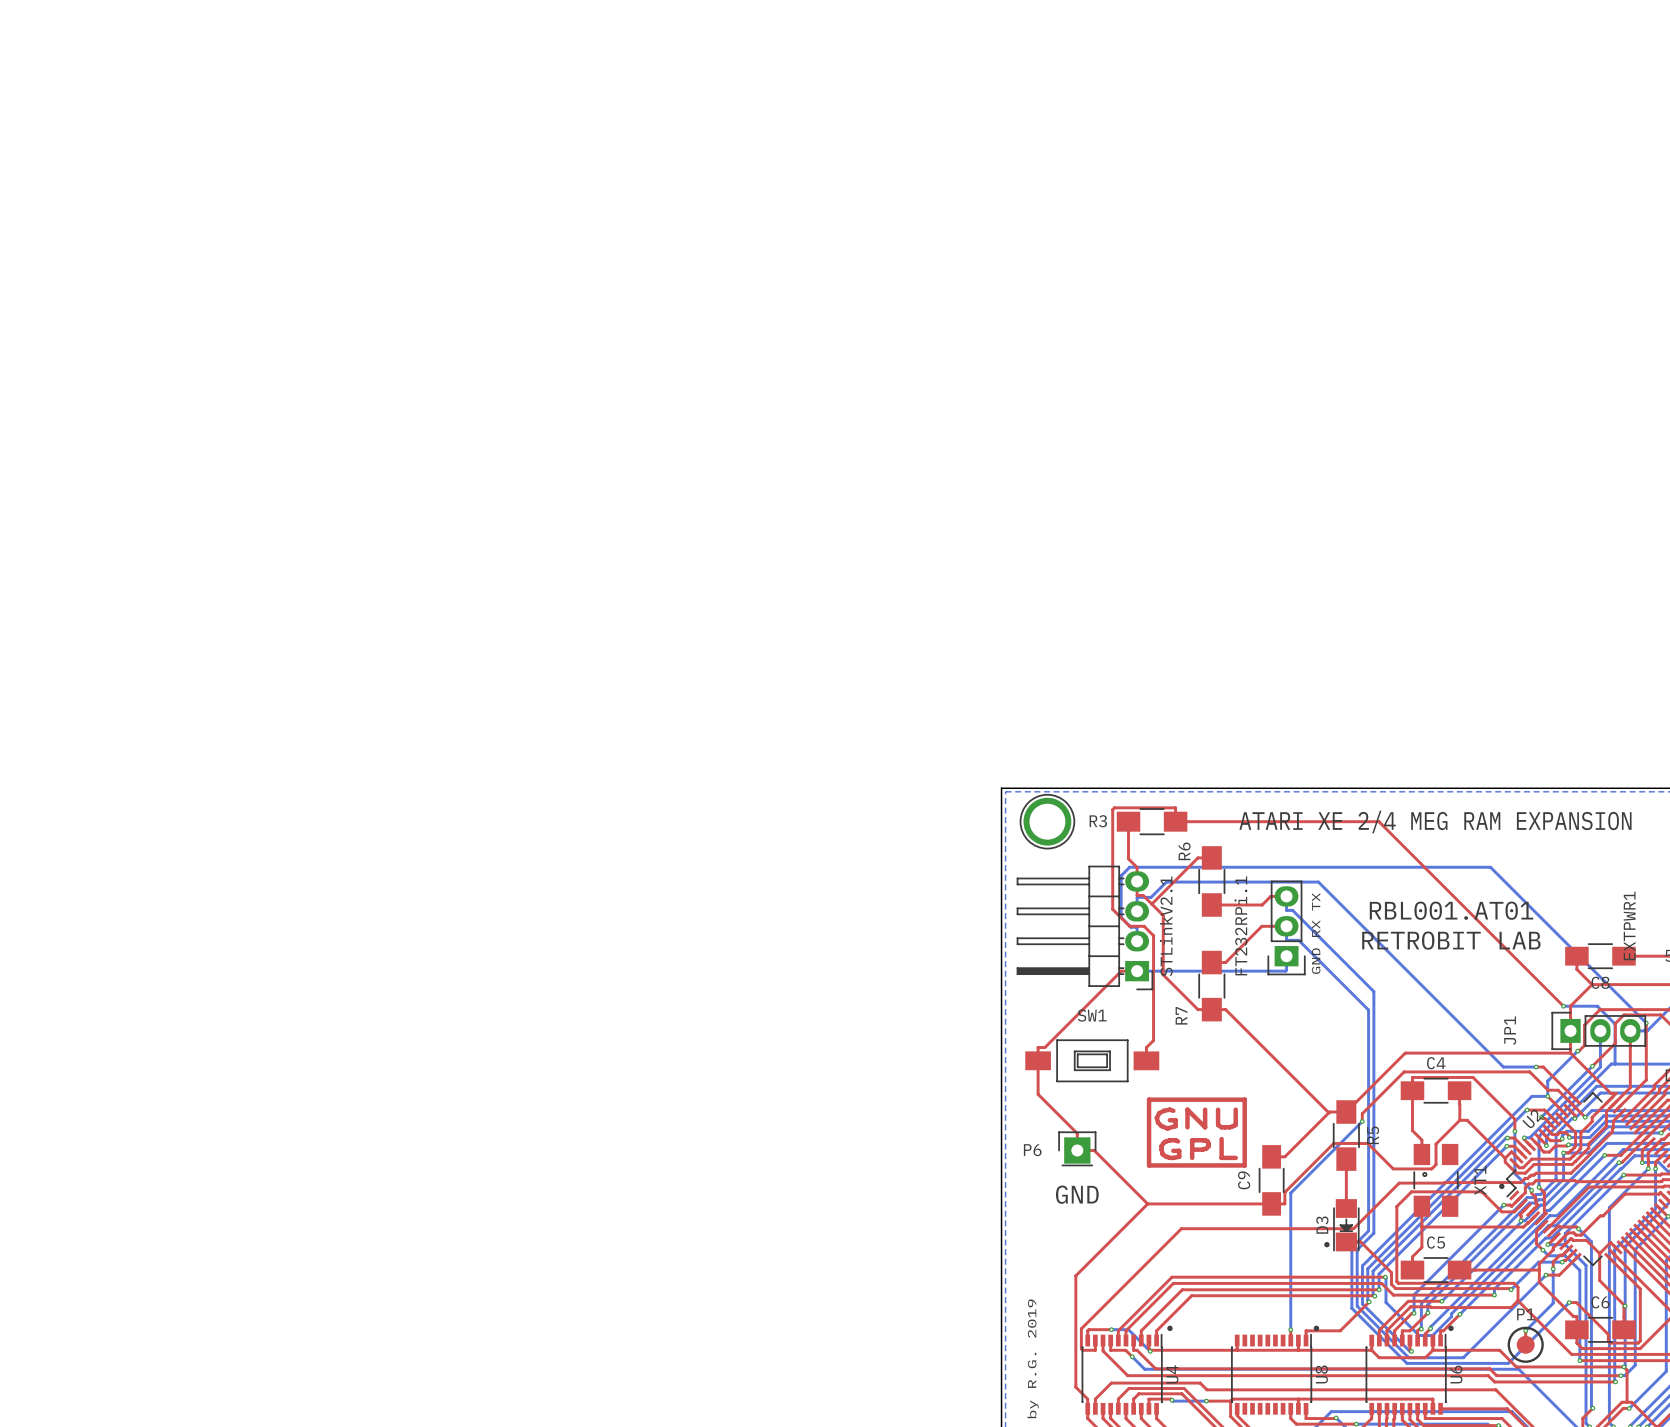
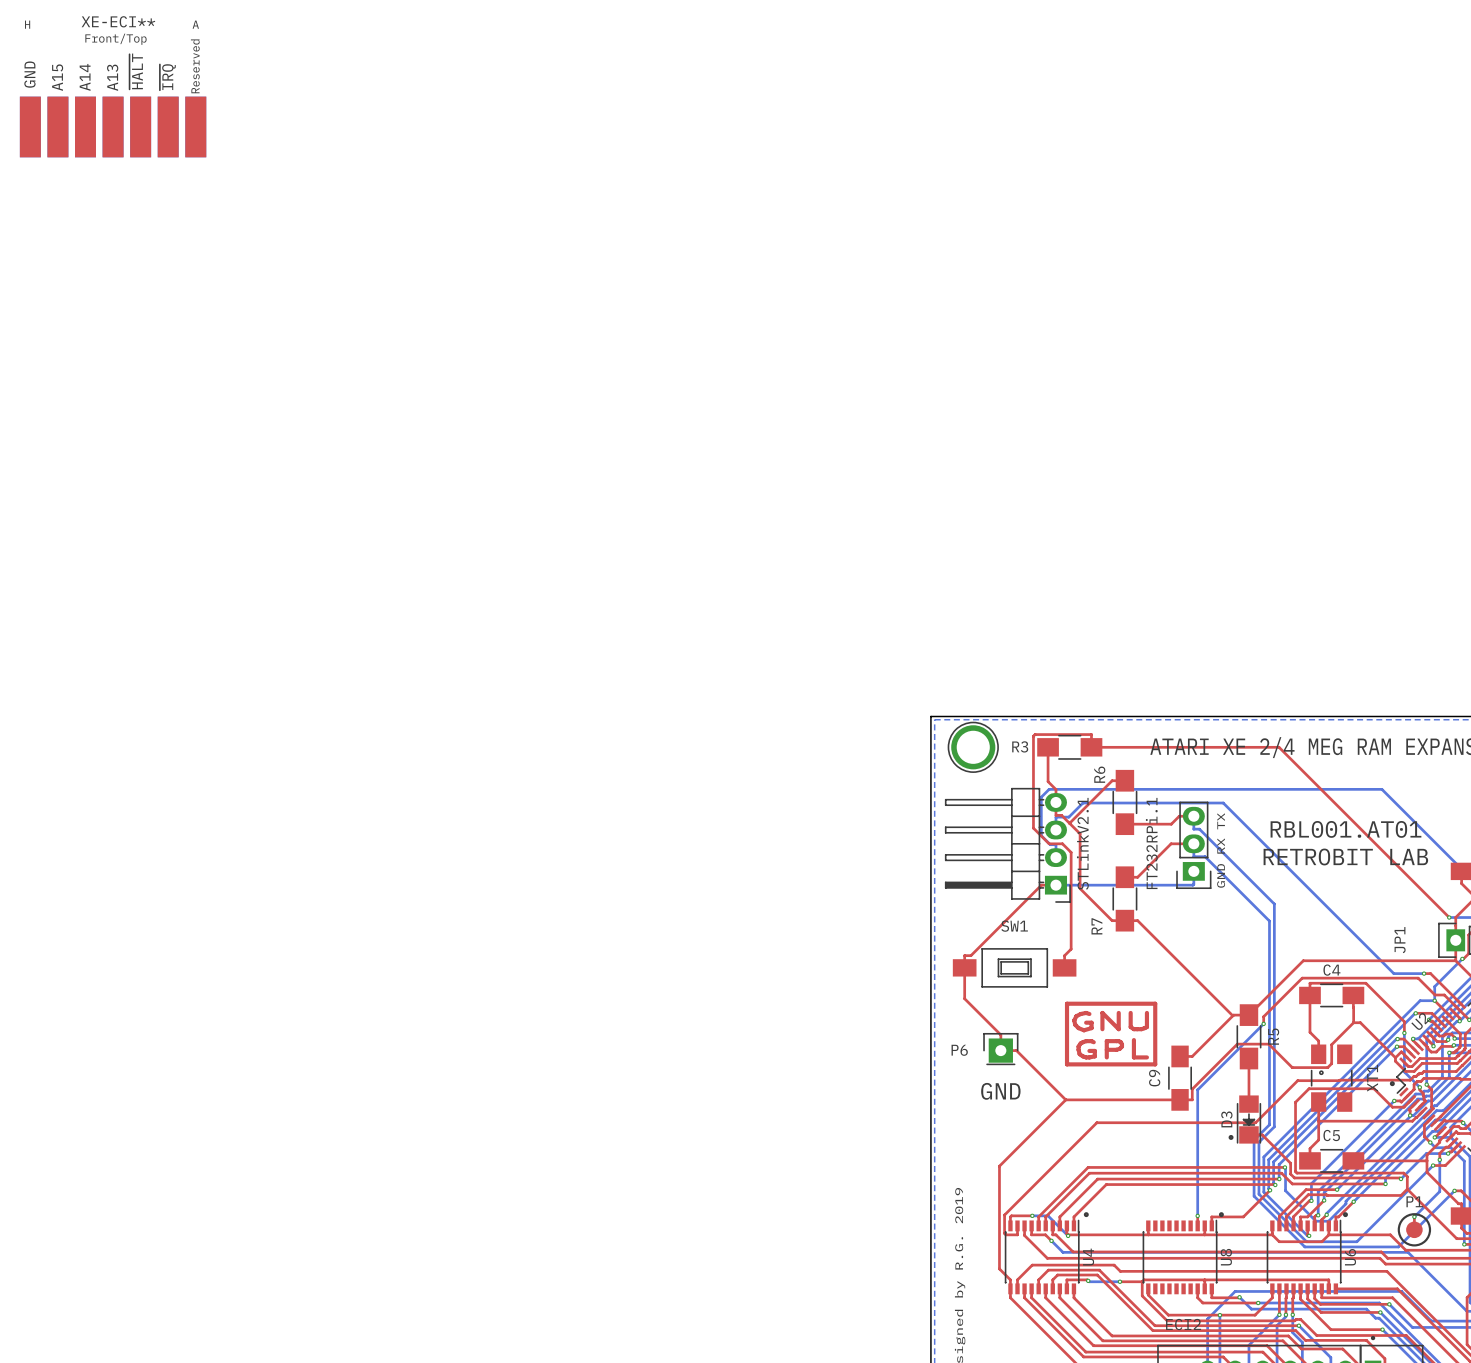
XE-ECI**: none -> (113, 126)

